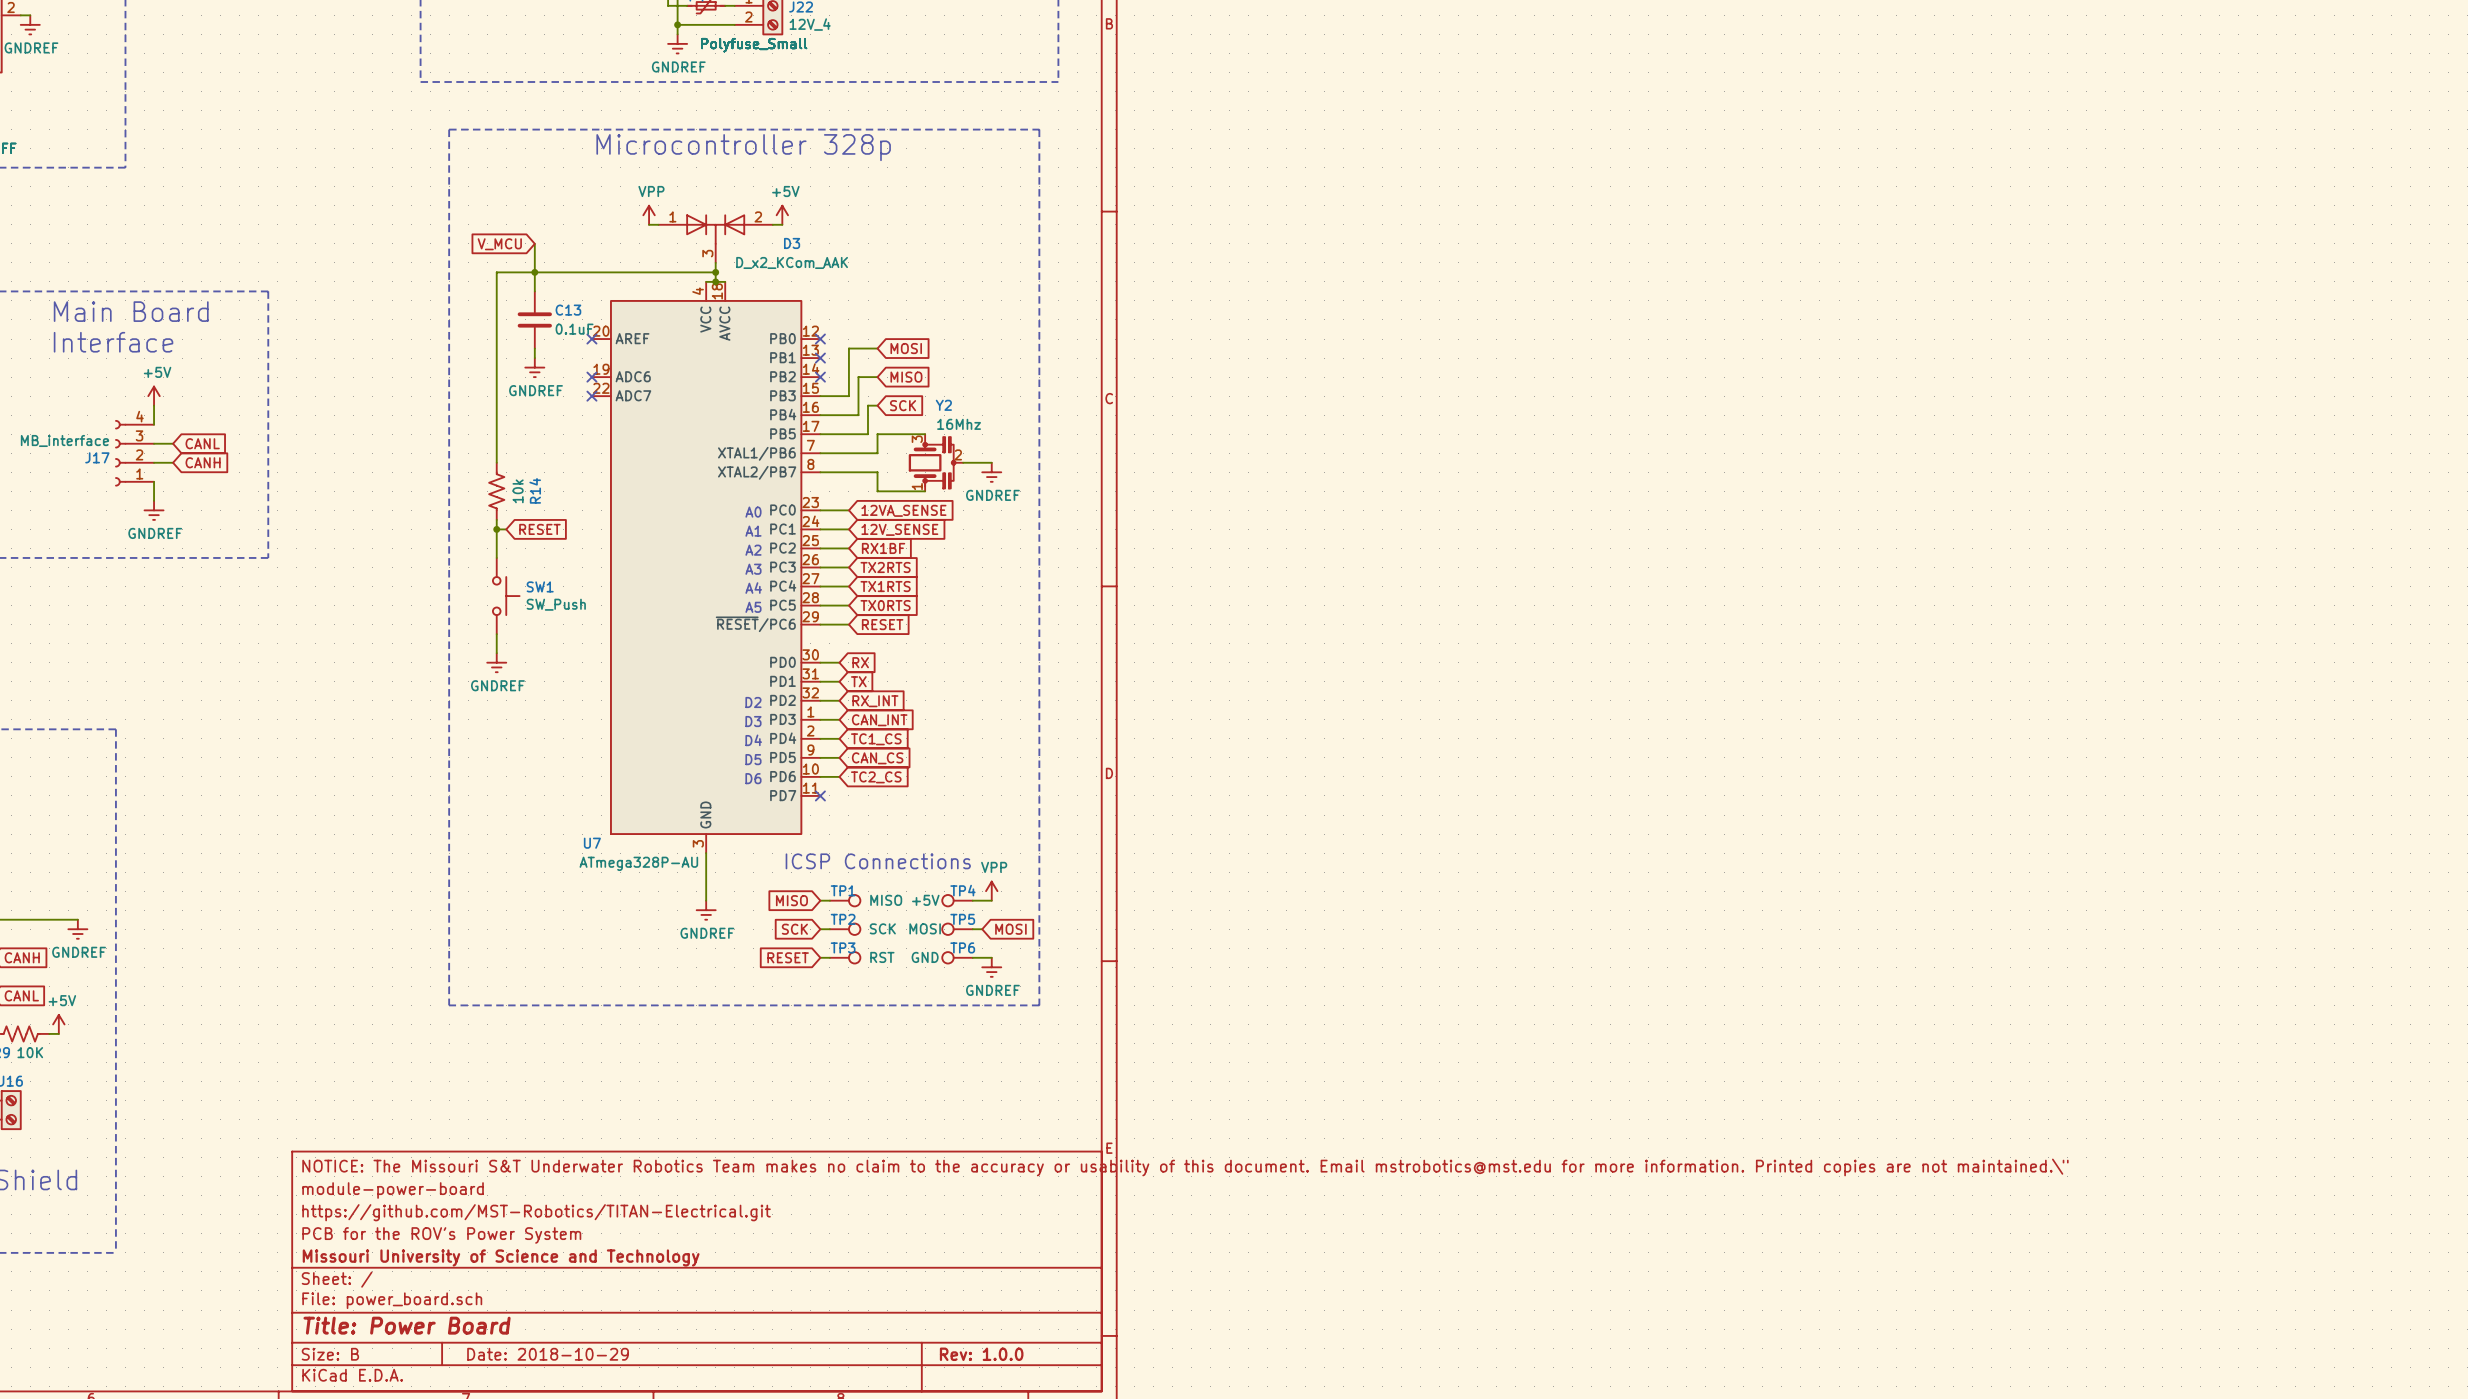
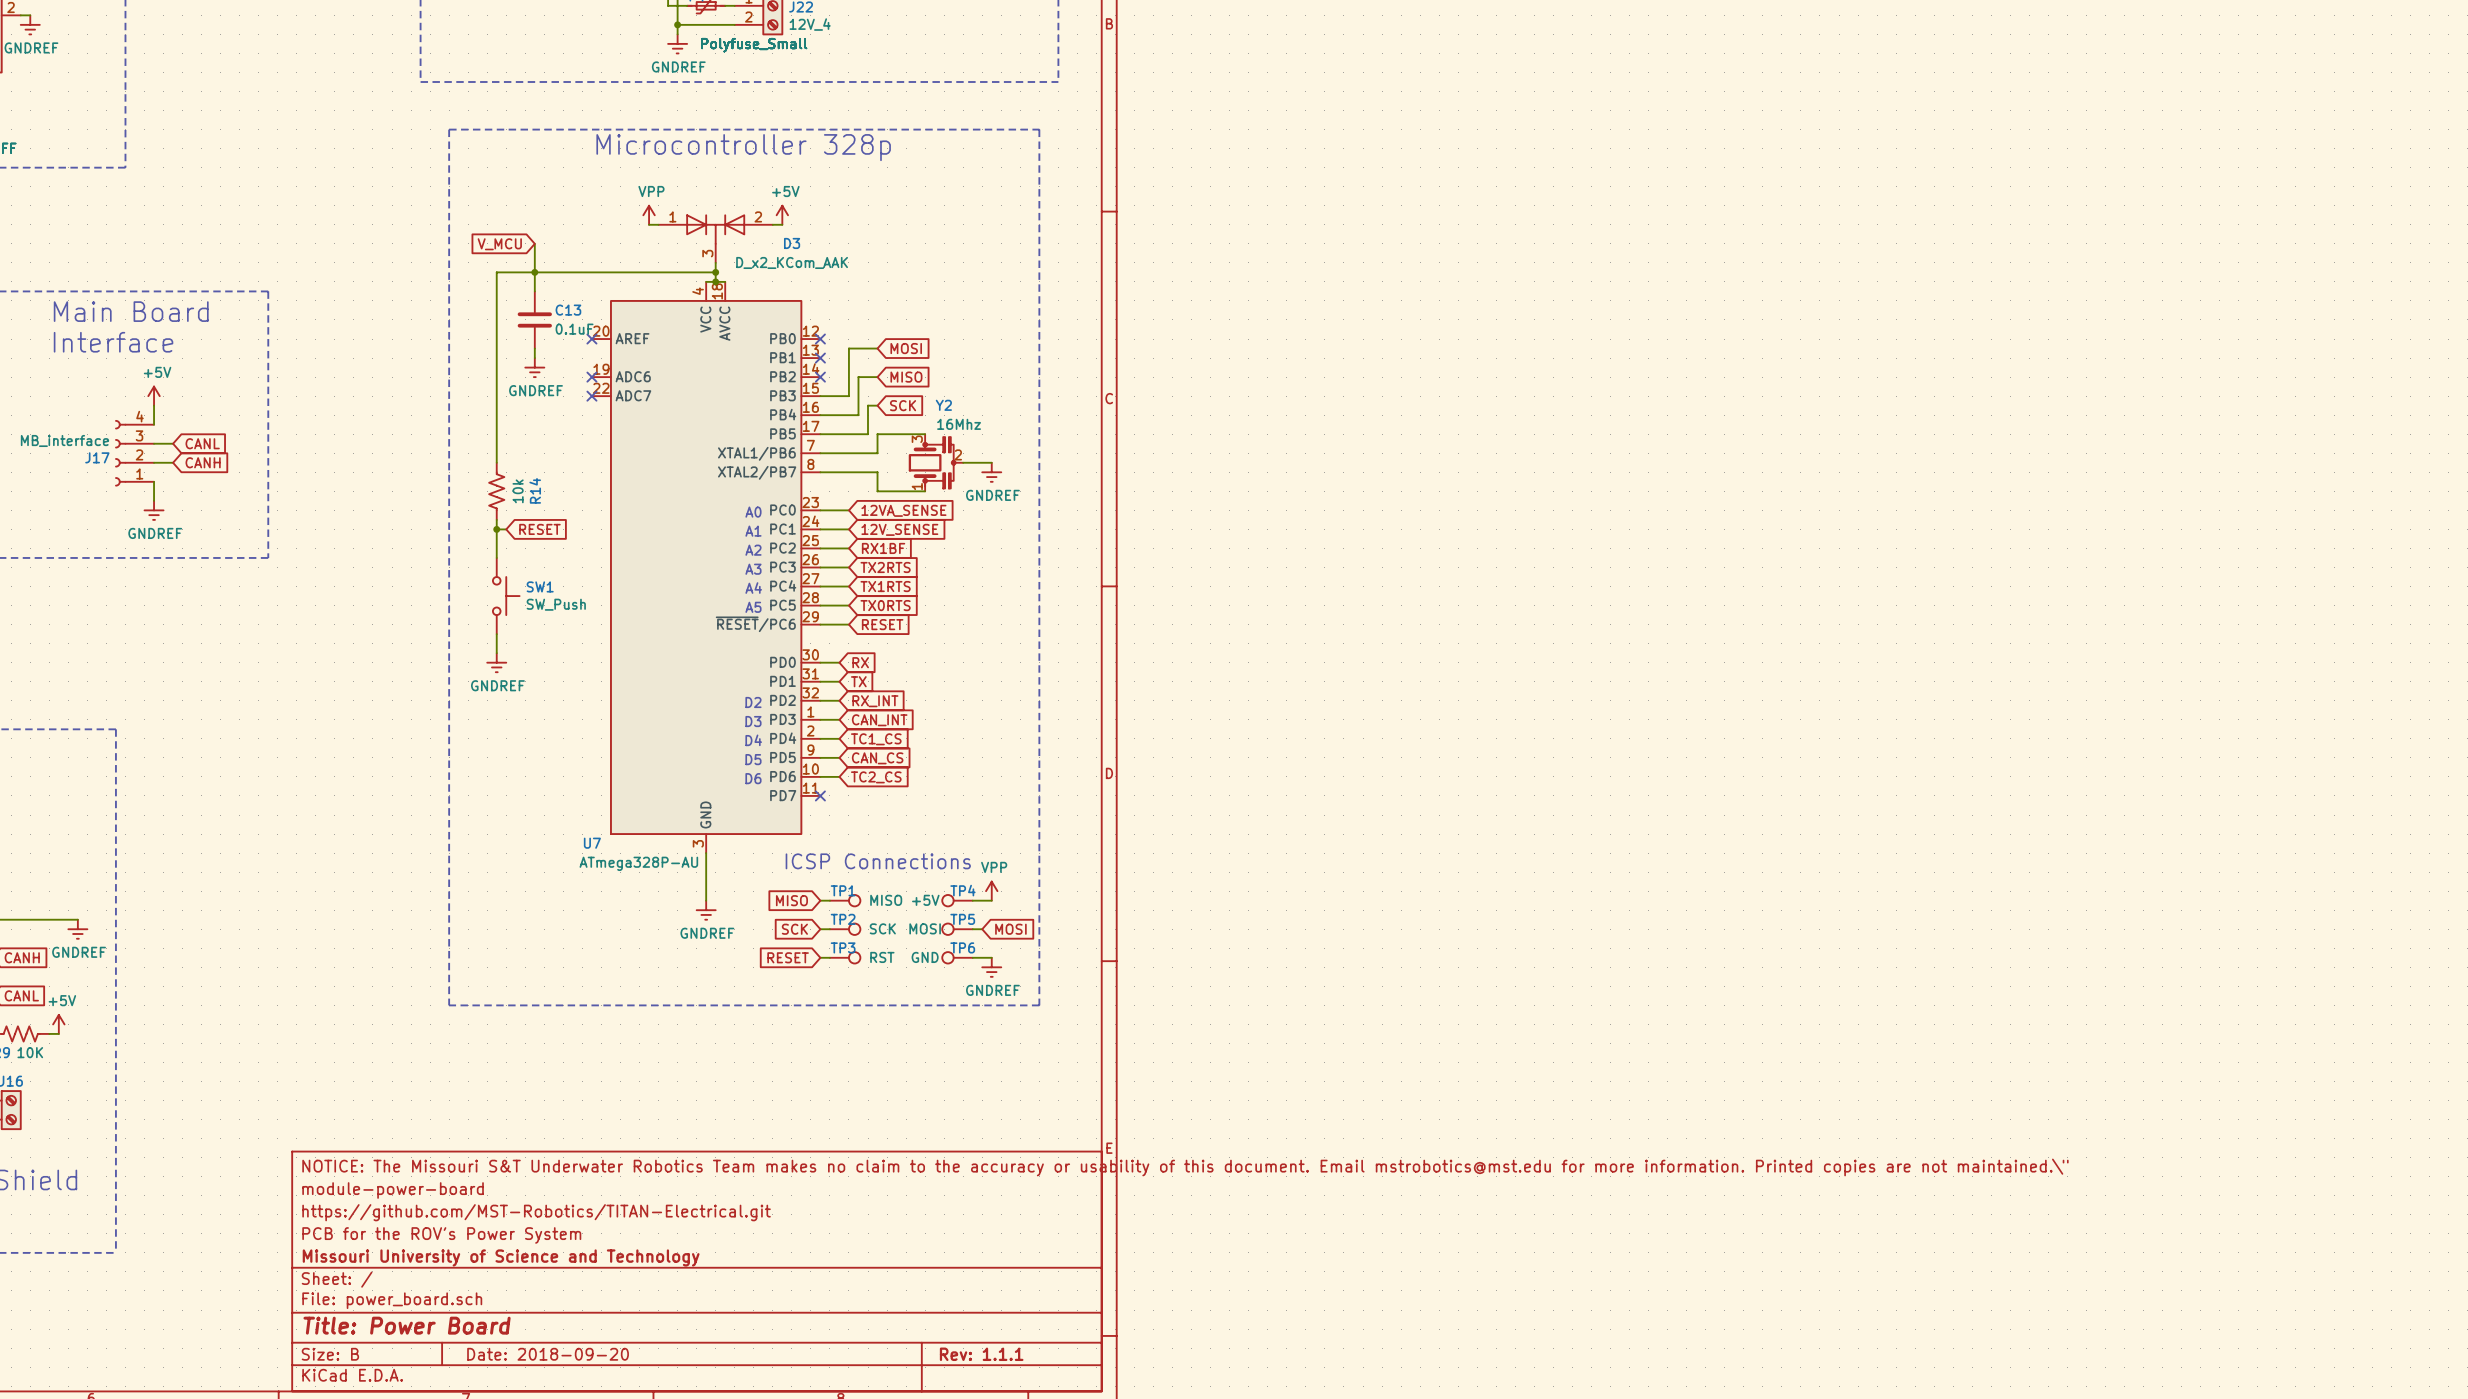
title block: Date: 2018-10-29 (548, 1354) -> Date: 2018-09-20 (548, 1354)
title block: Rev: 1.0.0 (981, 1354) -> Rev: 1.1.1 (981, 1354)

